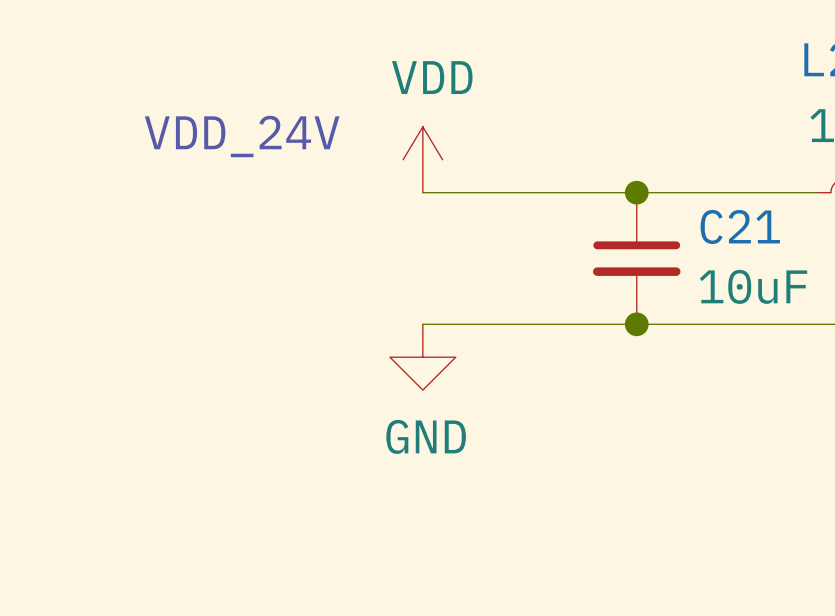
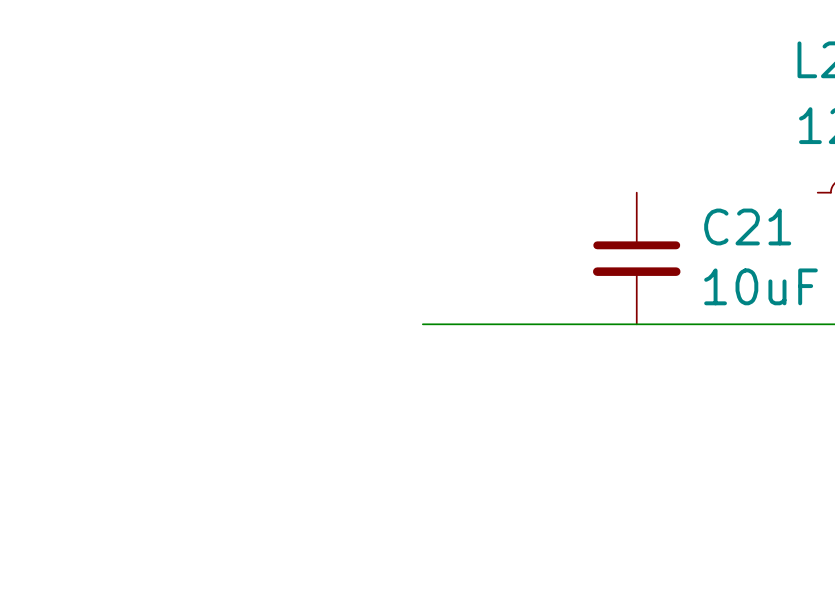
text: VDD_24V (242, 136) -> none
power symbol: VDD (422, 159) -> none
wire: (422, 192) (817, 192) -> none
junction: (636, 192) -> none
junction: (636, 324) -> none
power symbol: GND (422, 357) -> none

